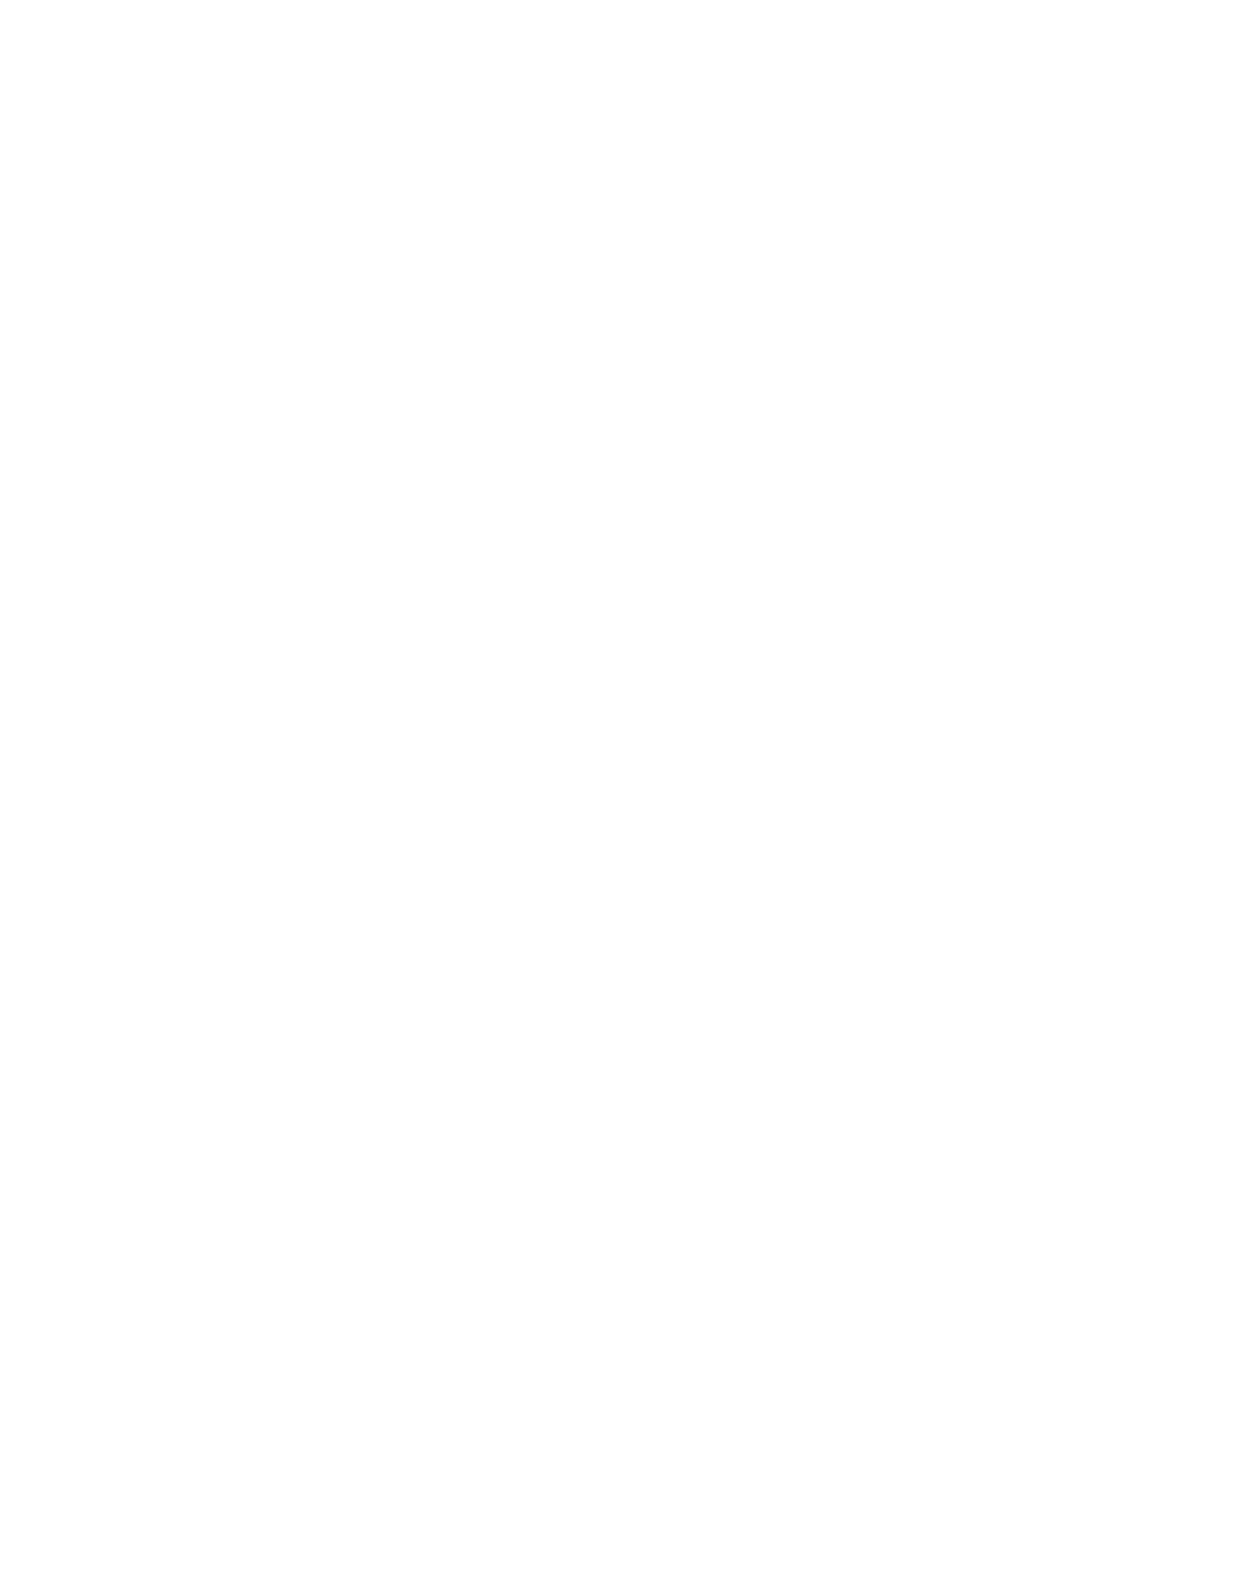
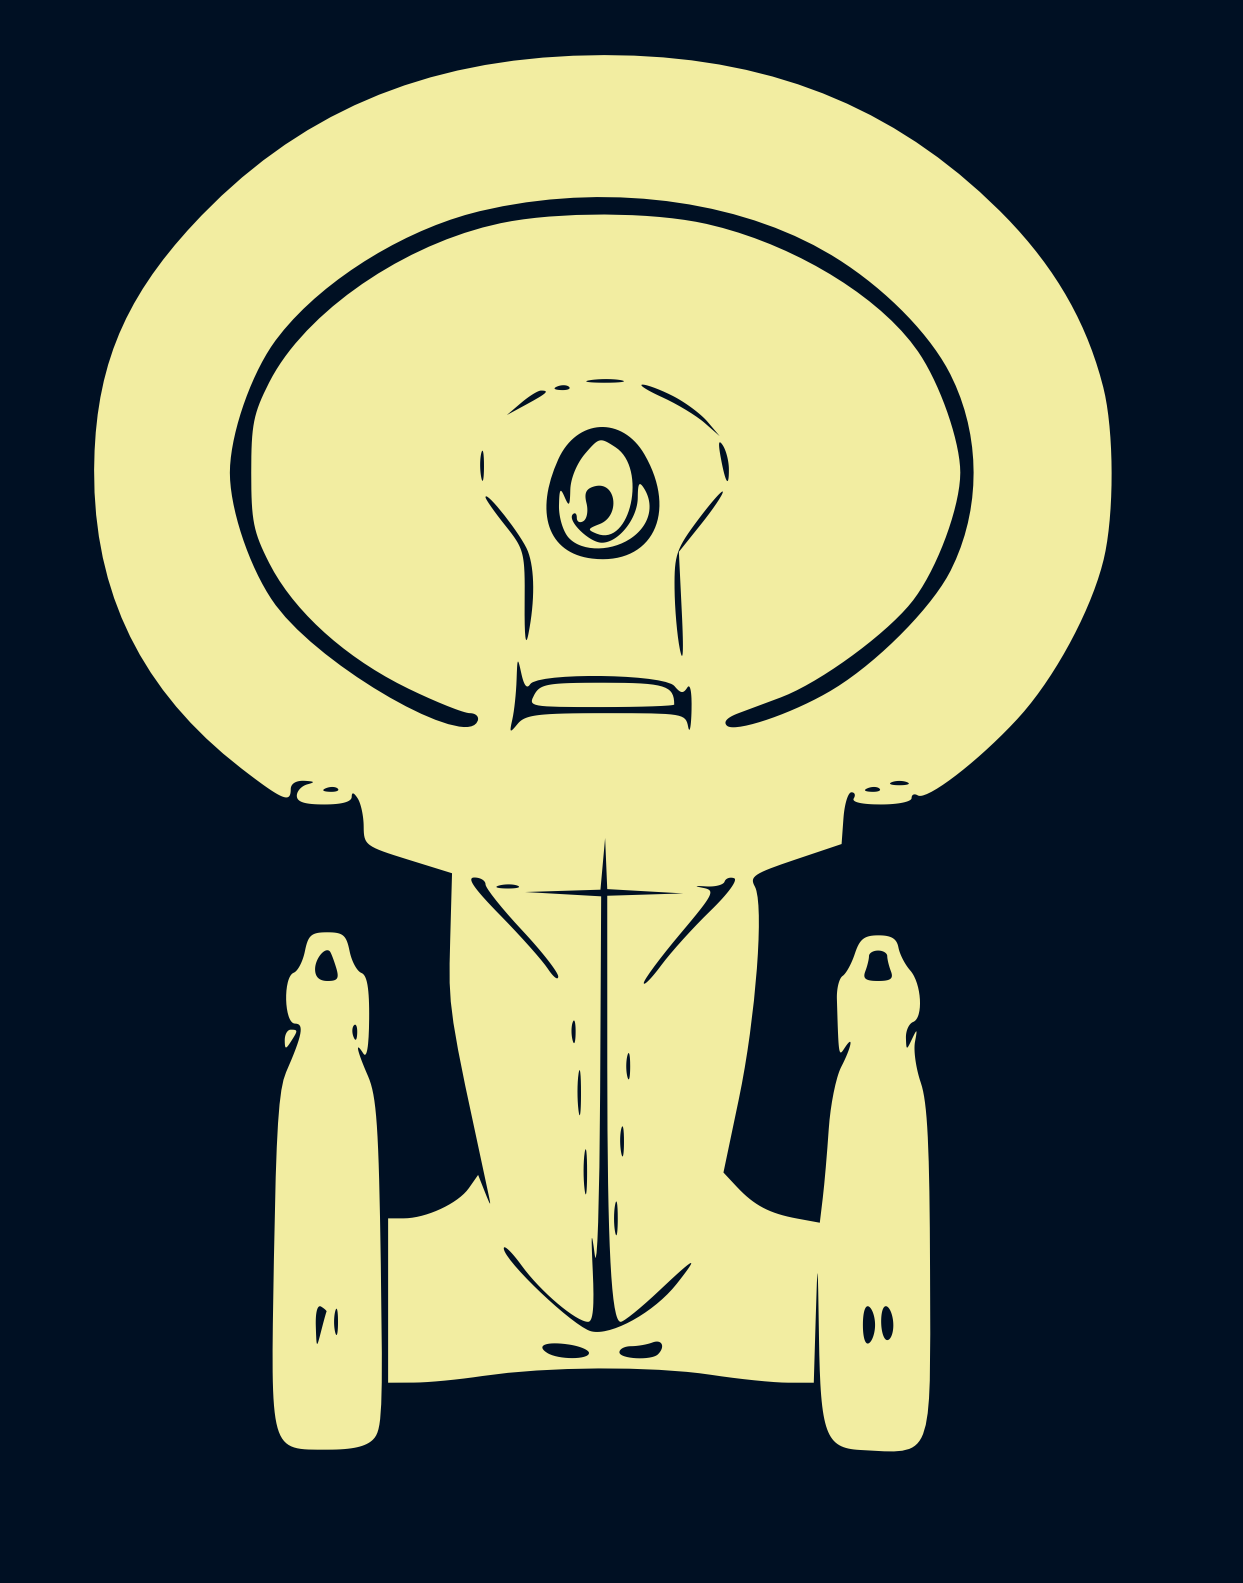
drawing: none -> [94, 55, 1112, 1452]

